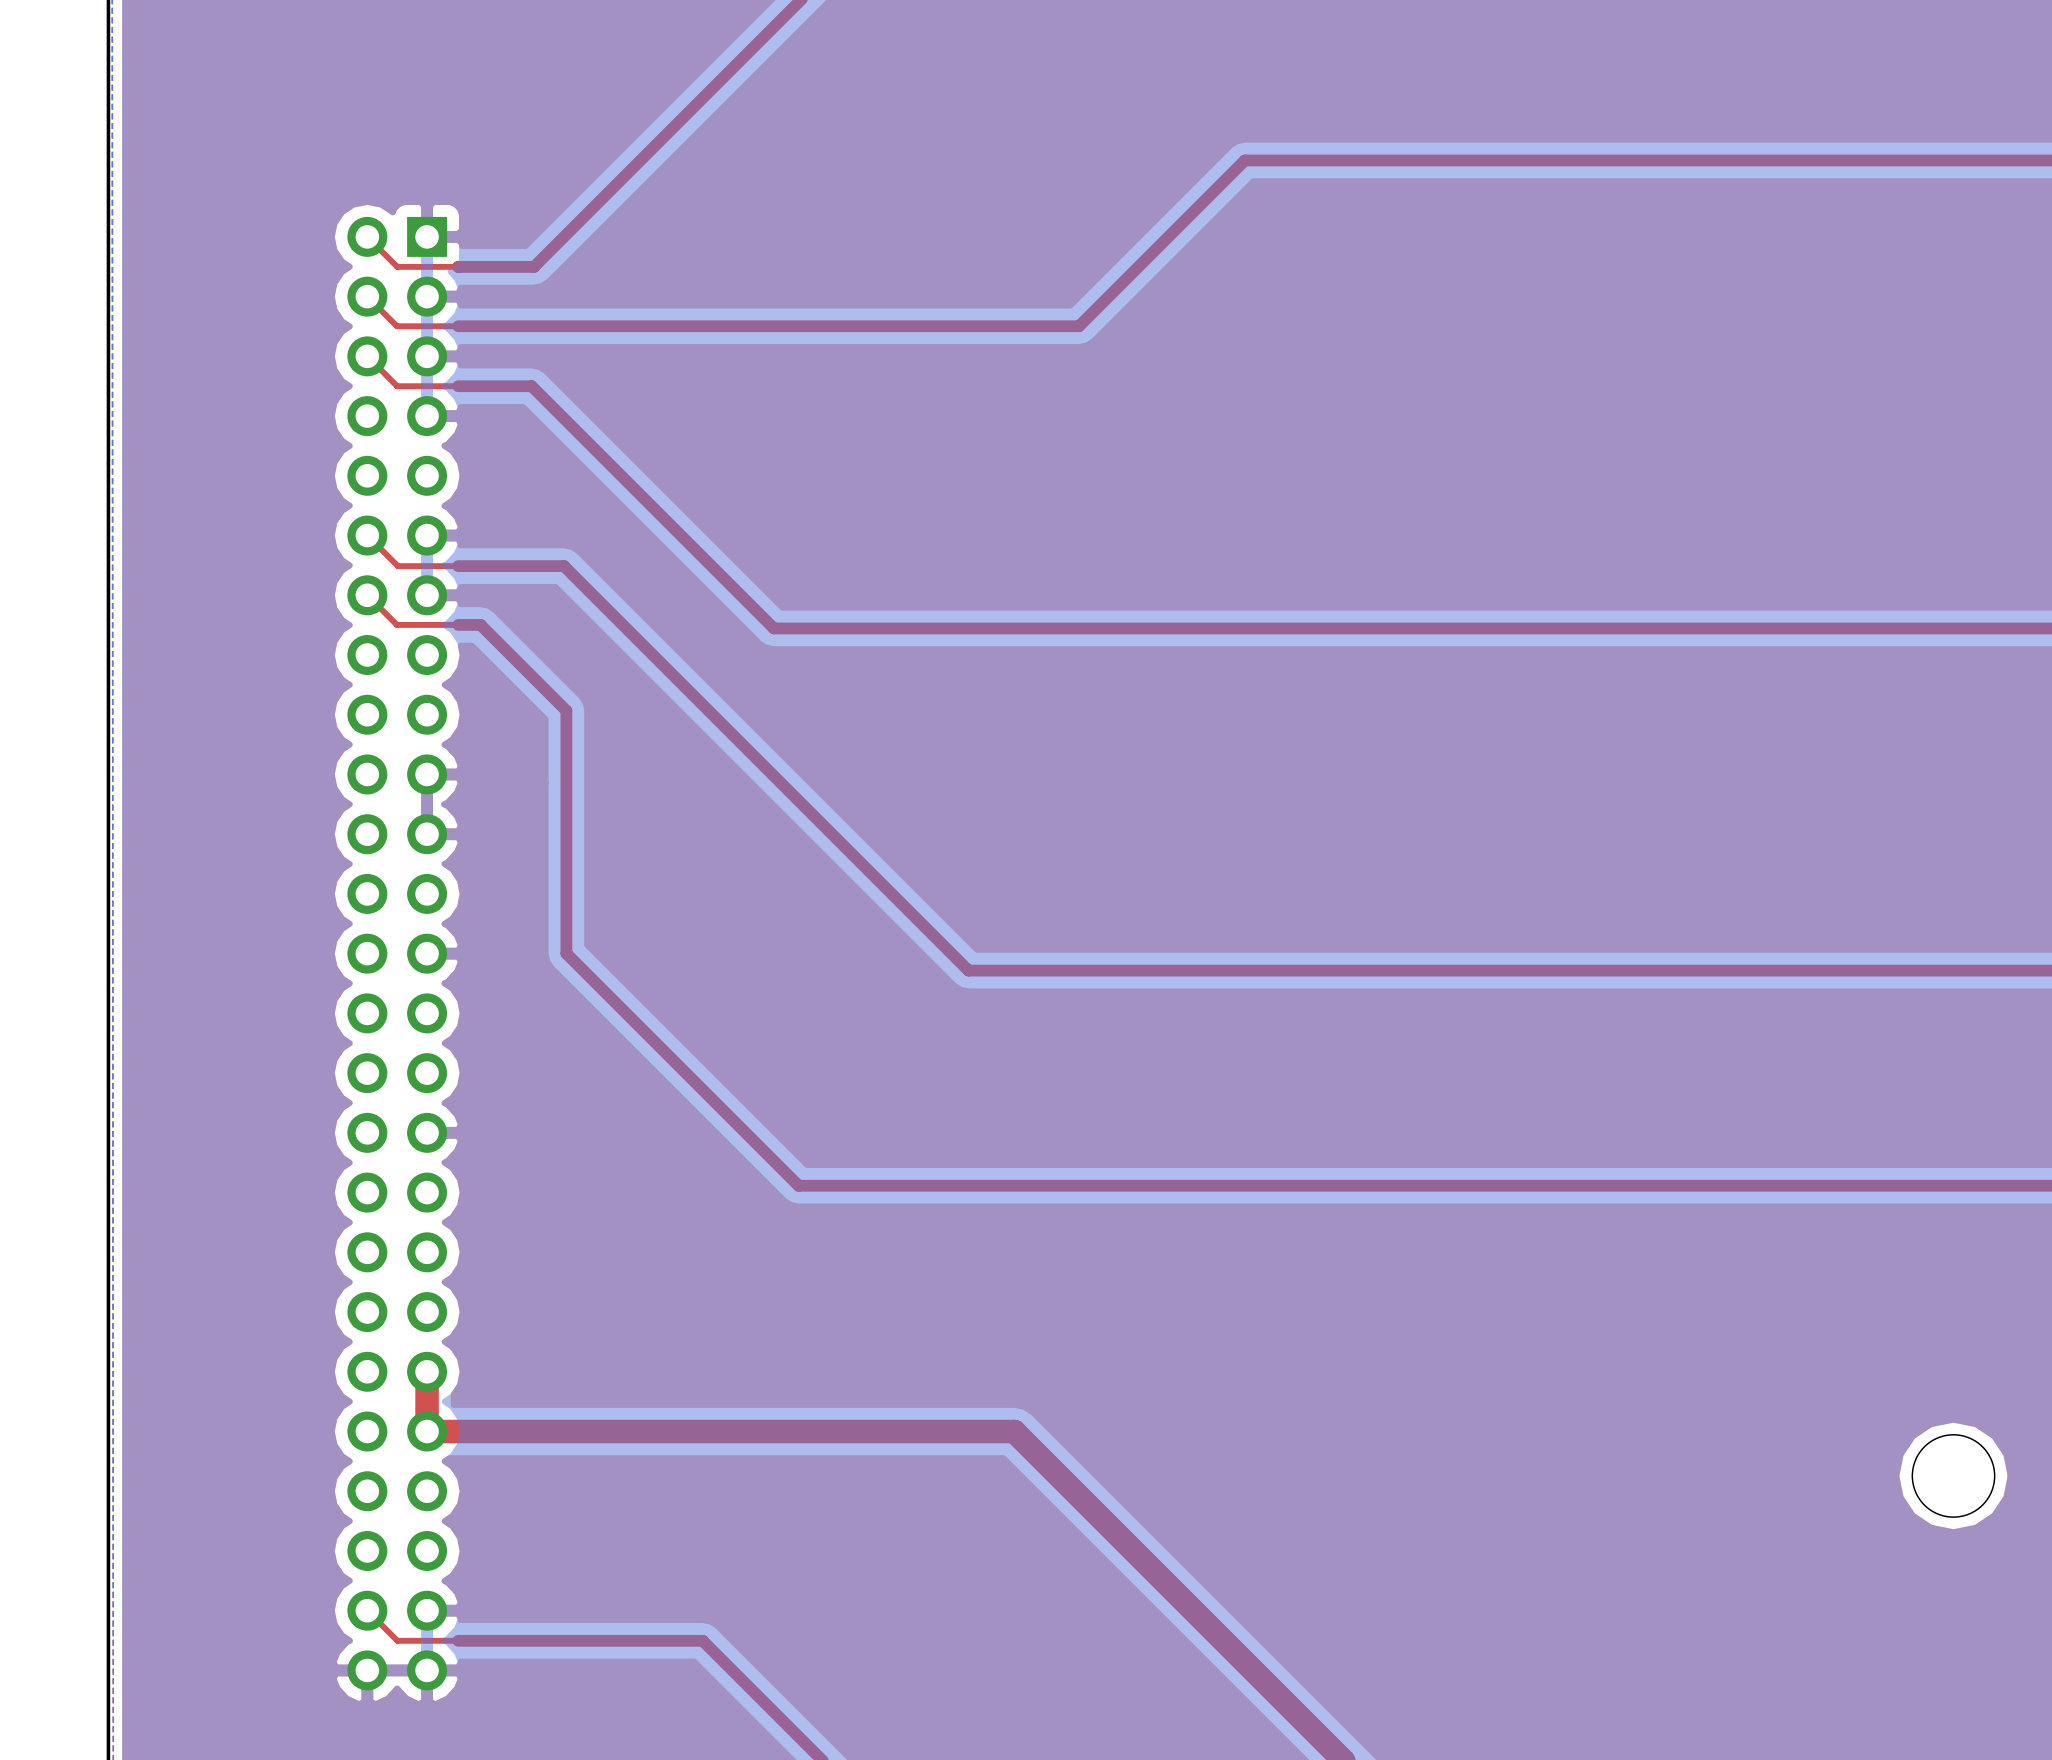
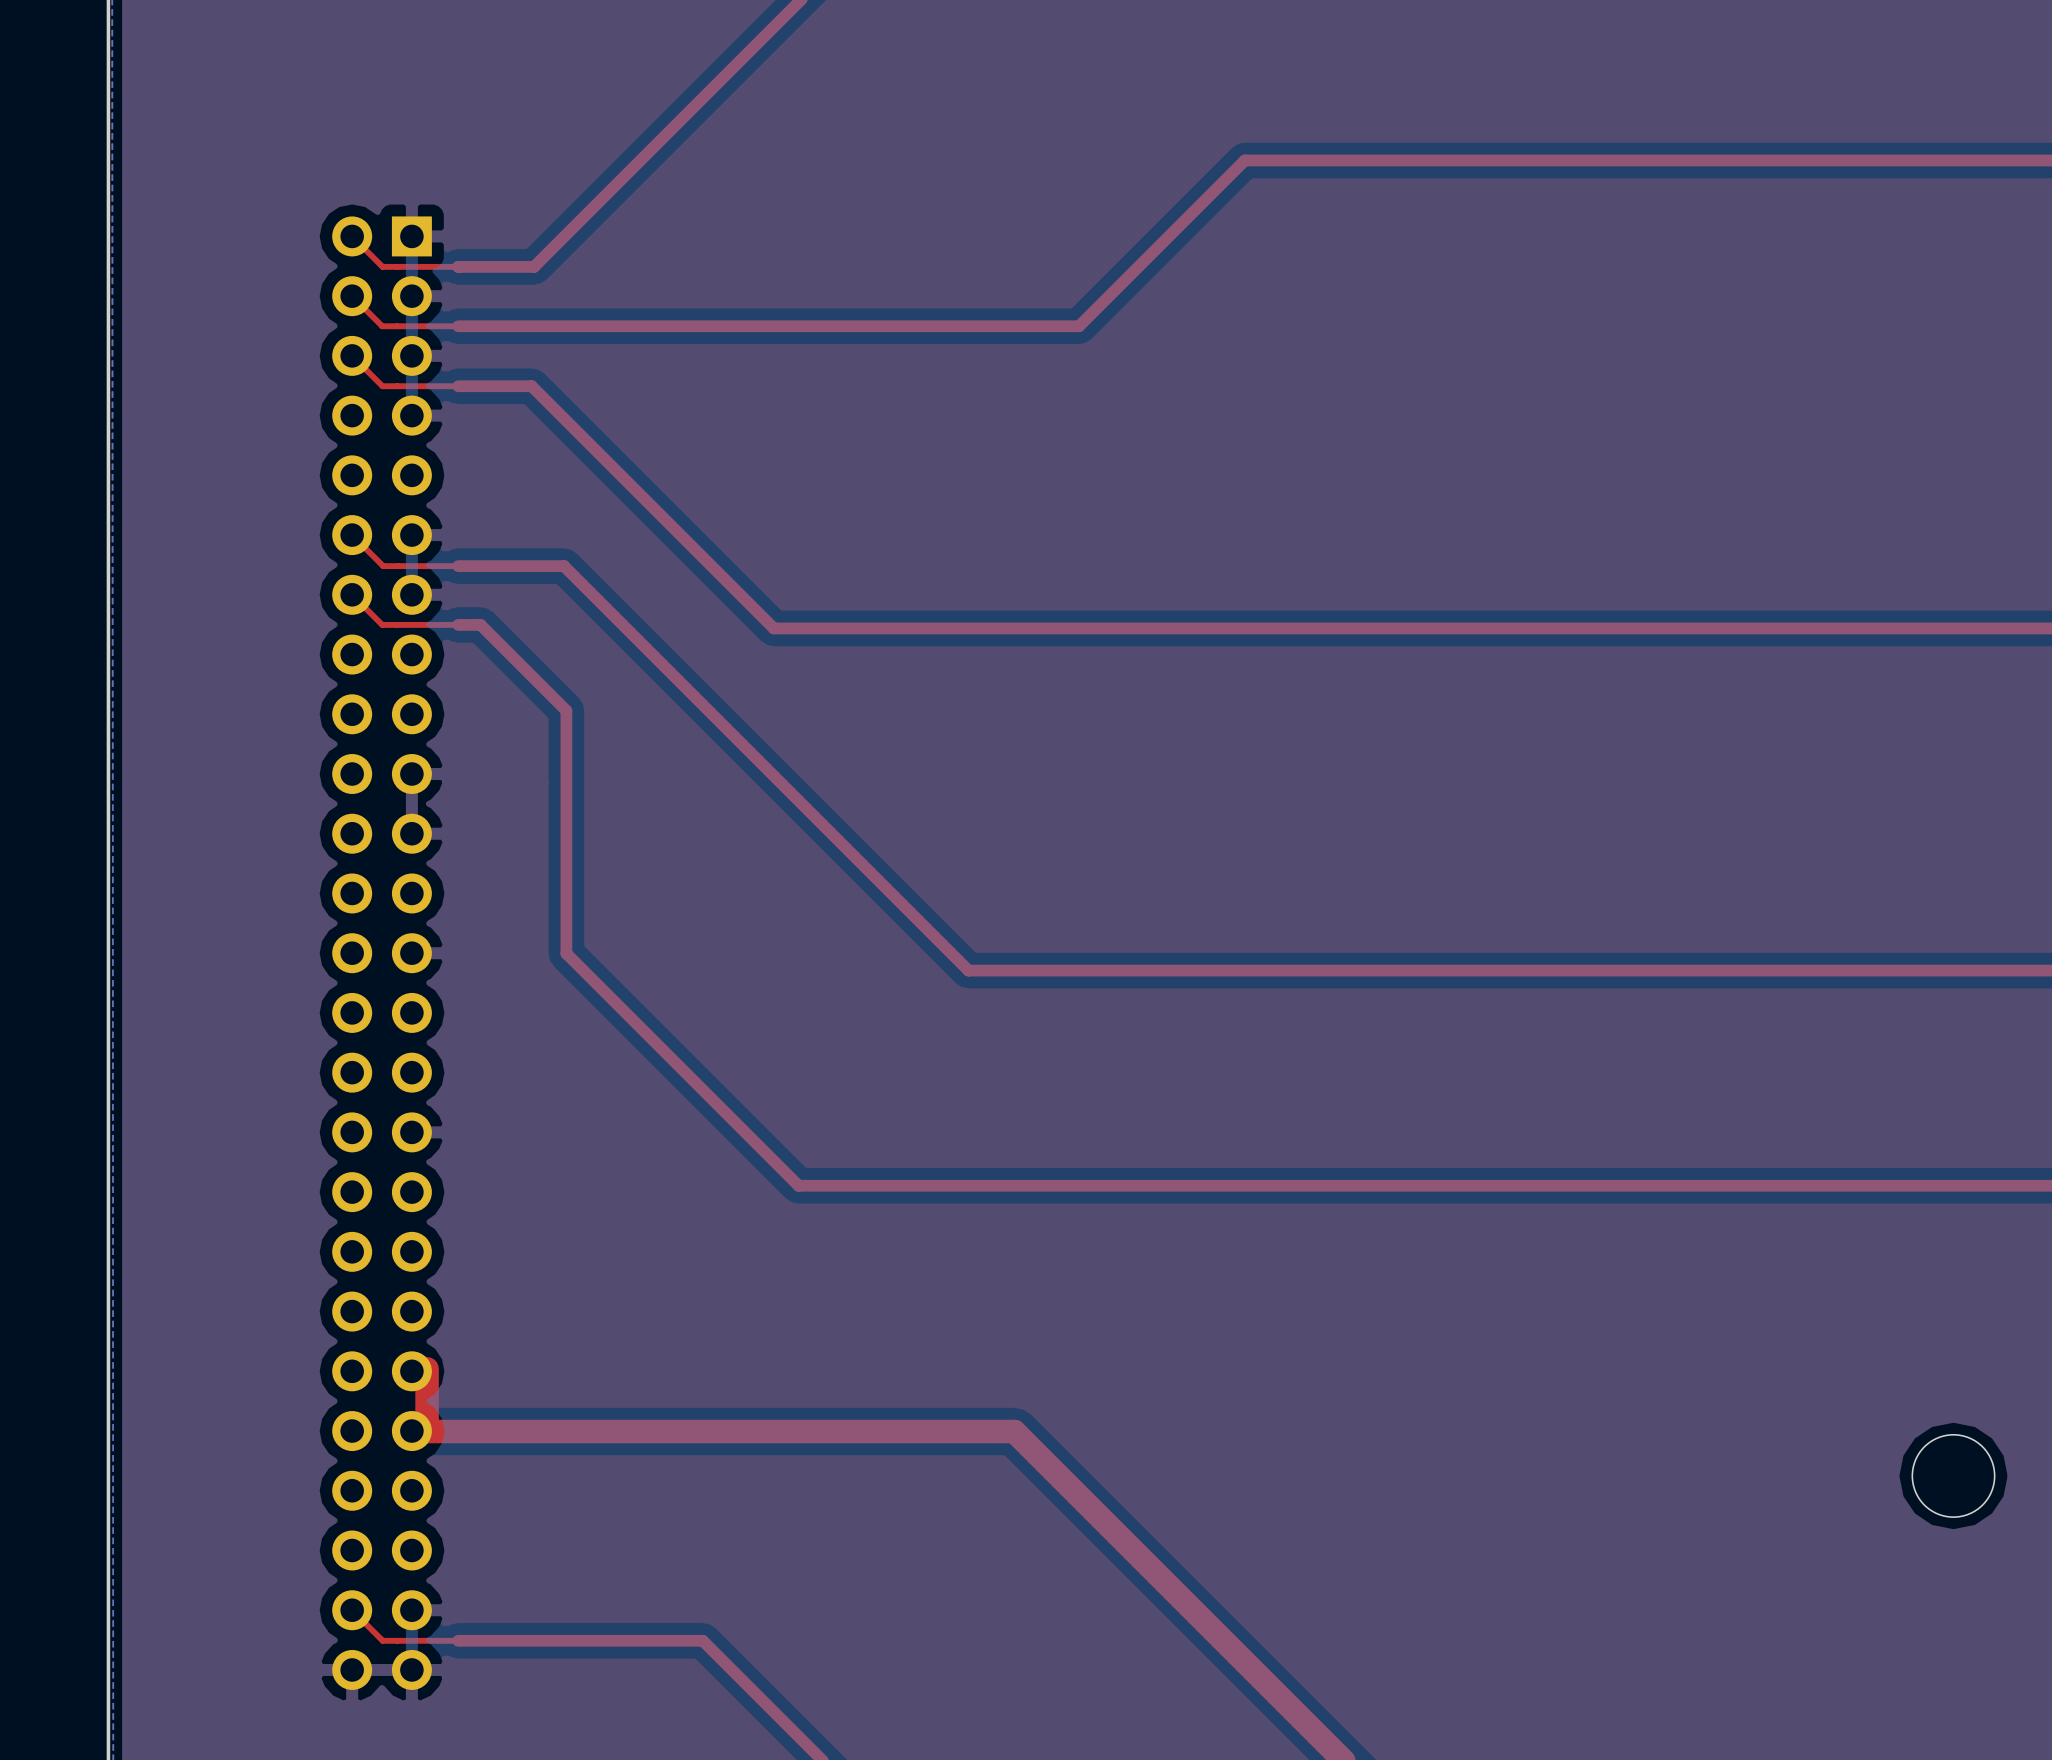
top track: (367, 236) (397, 266) -> (352, 236) (382, 266) (397, 266)
top track: (367, 296) (396, 326) -> (352, 296) (382, 326) (396, 326)
top track: (367, 356) (397, 386) -> (352, 355) (382, 386) (397, 386)
top track: (367, 535) (397, 566) -> (352, 535) (383, 566) (397, 566)
top track: (367, 595) (396, 624) -> (352, 594) (382, 624) (396, 624)
part position: (397, 953) -> (382, 953)
top track: (367, 1610) (397, 1640) -> (352, 1610) (382, 1640) (397, 1640)

